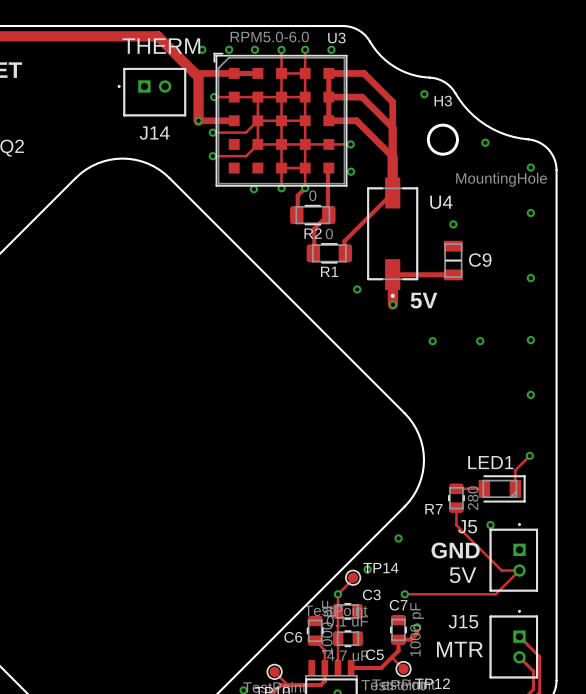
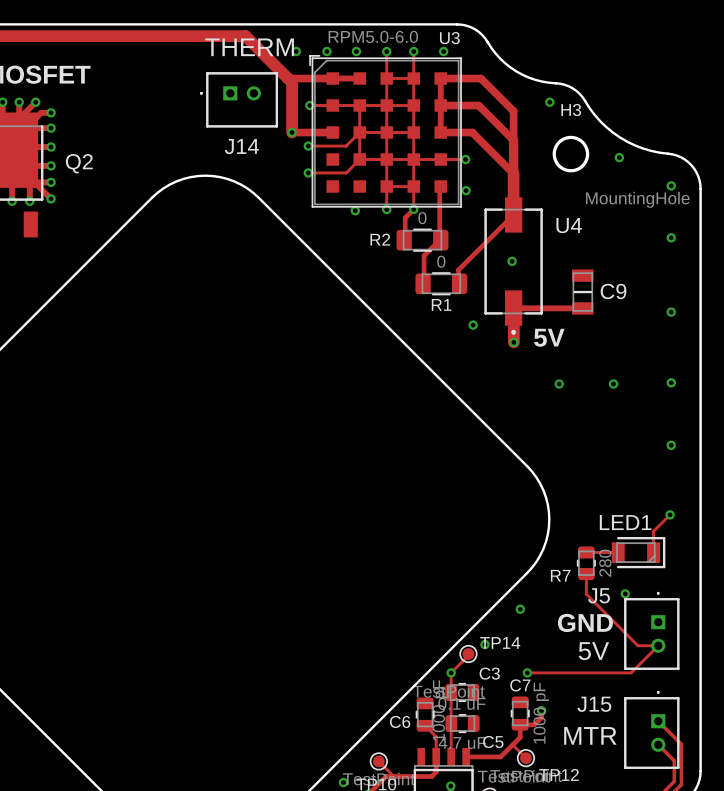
via: (453, 224) -> none
R2 name position: R2 (313, 233) -> R2 (380, 239)
via: none -> (512, 261)

